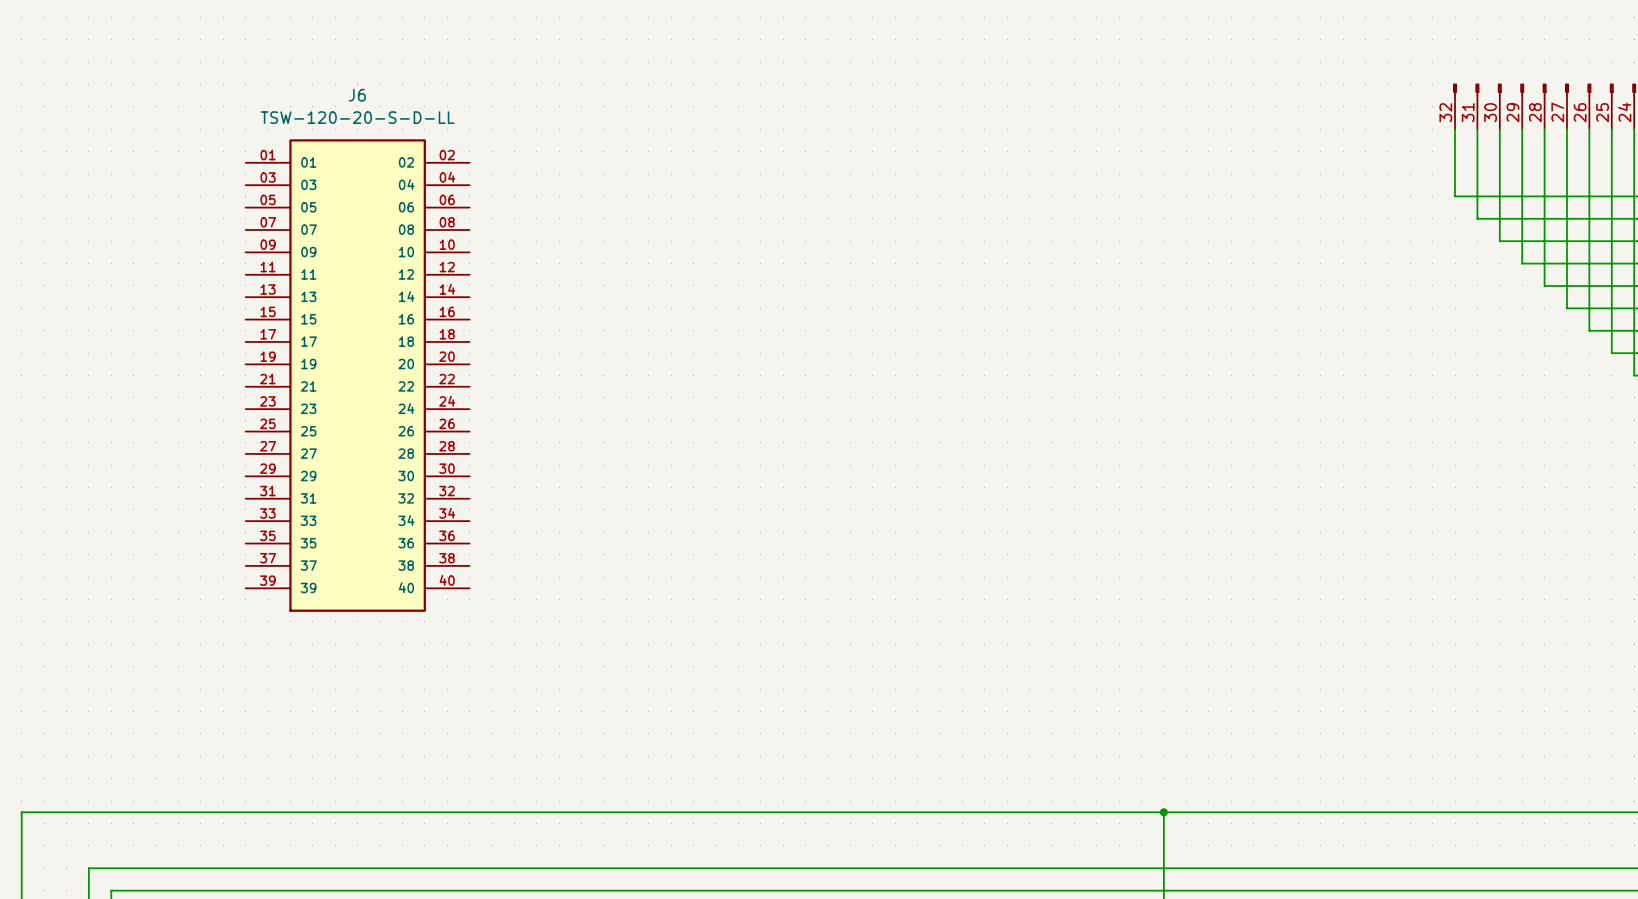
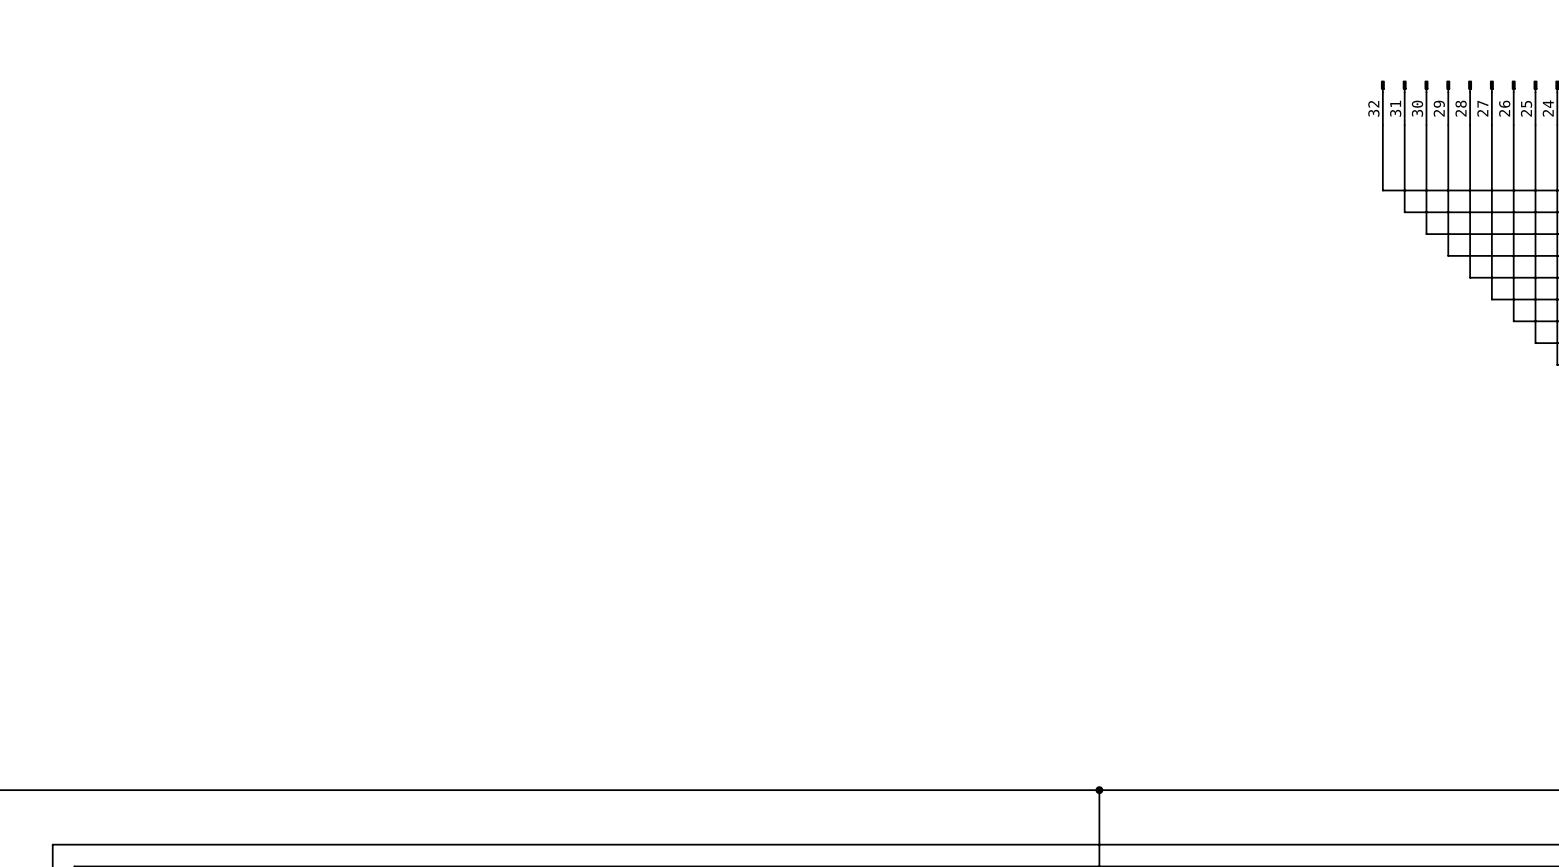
J6: TSW-120-20-S-D-LL (357, 375) -> none

